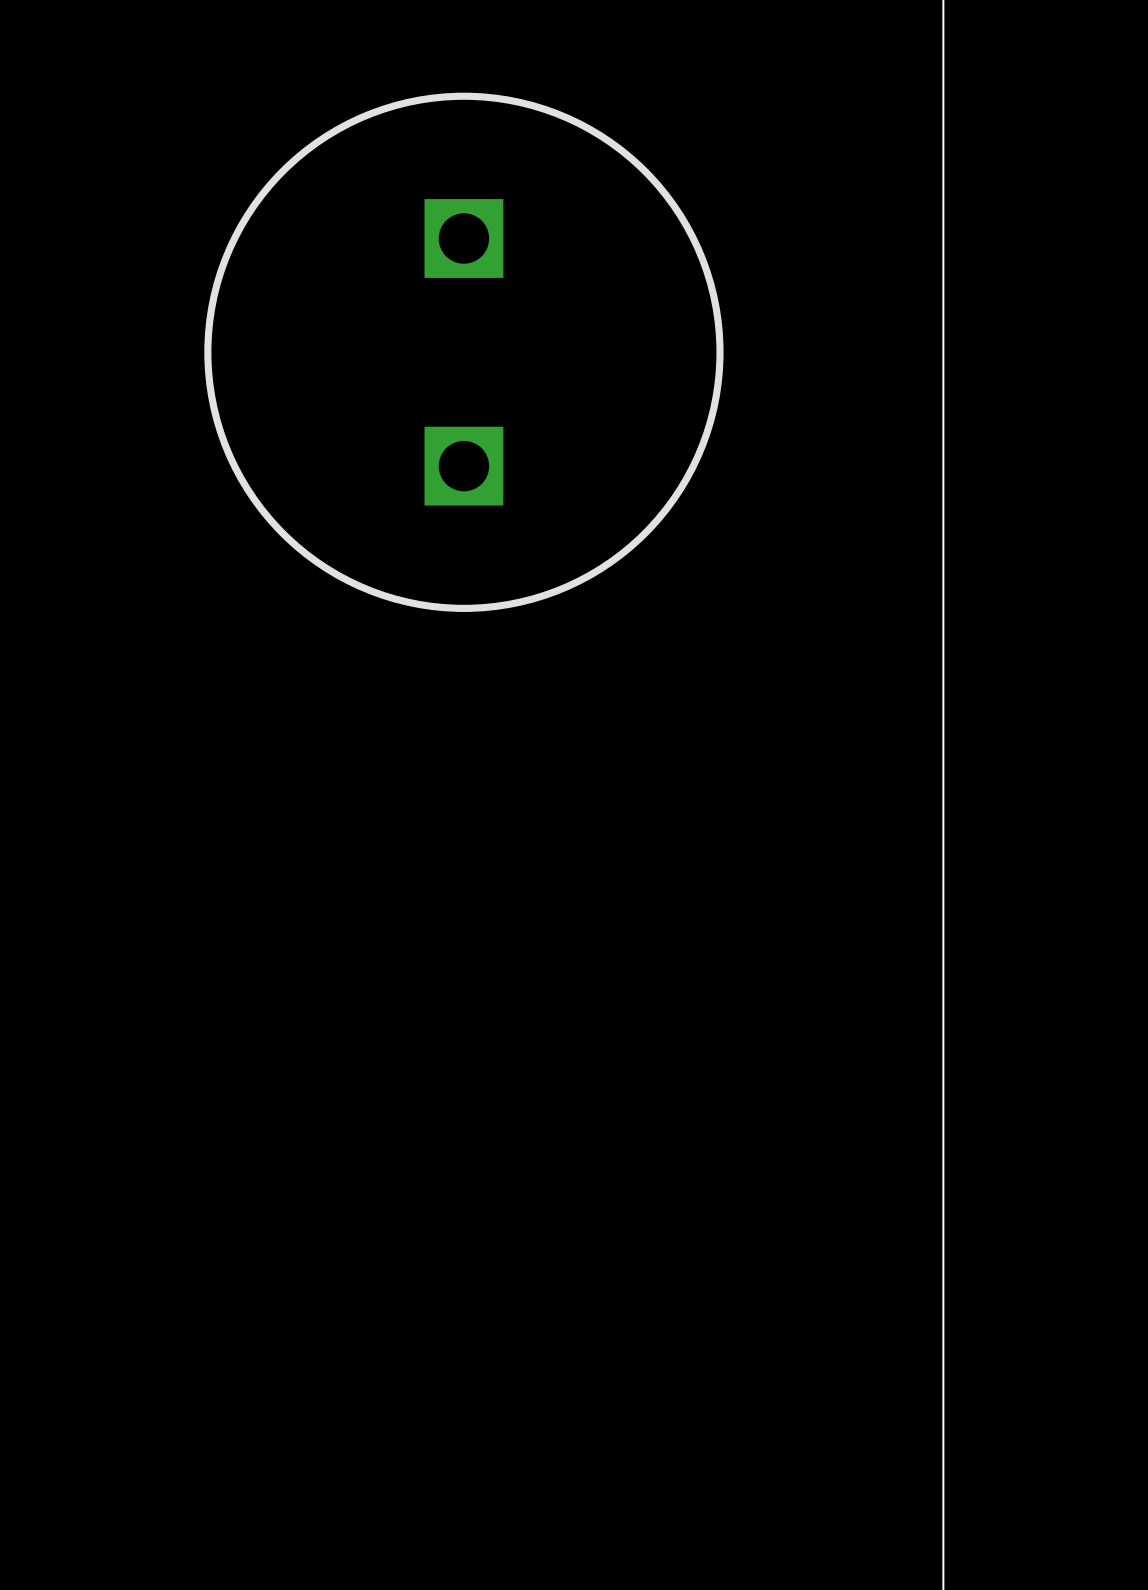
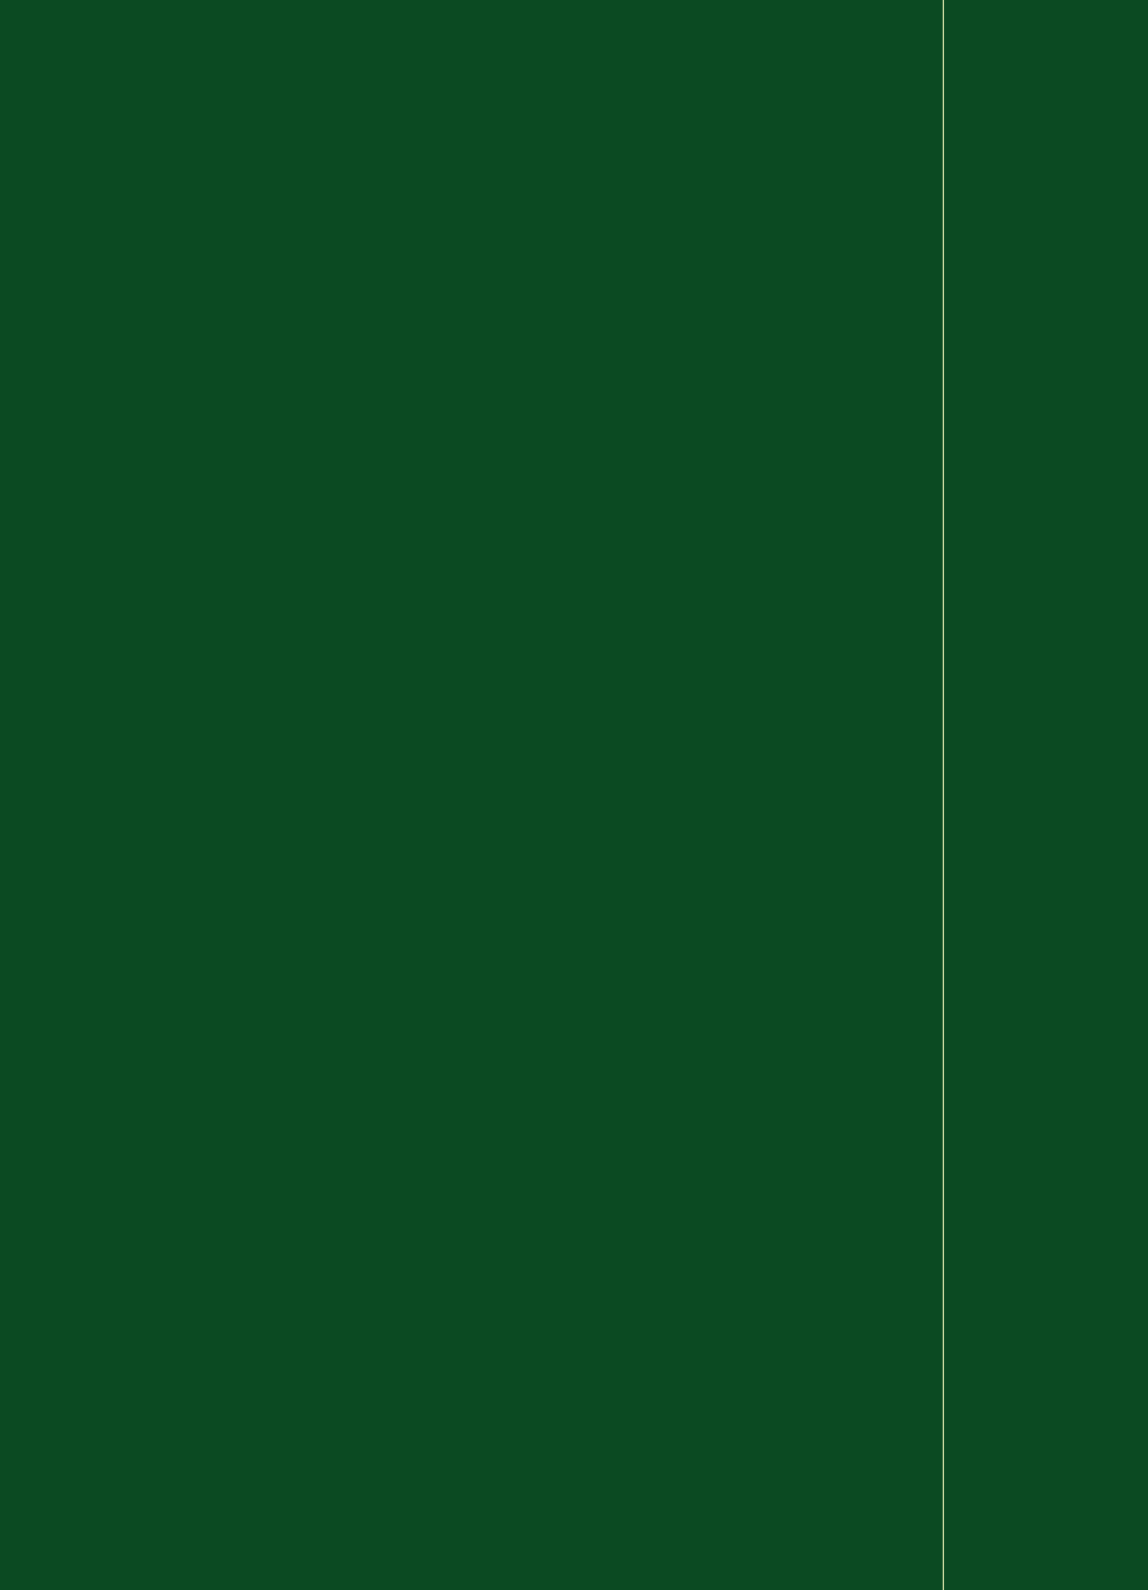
part: (463, 352) -> none

